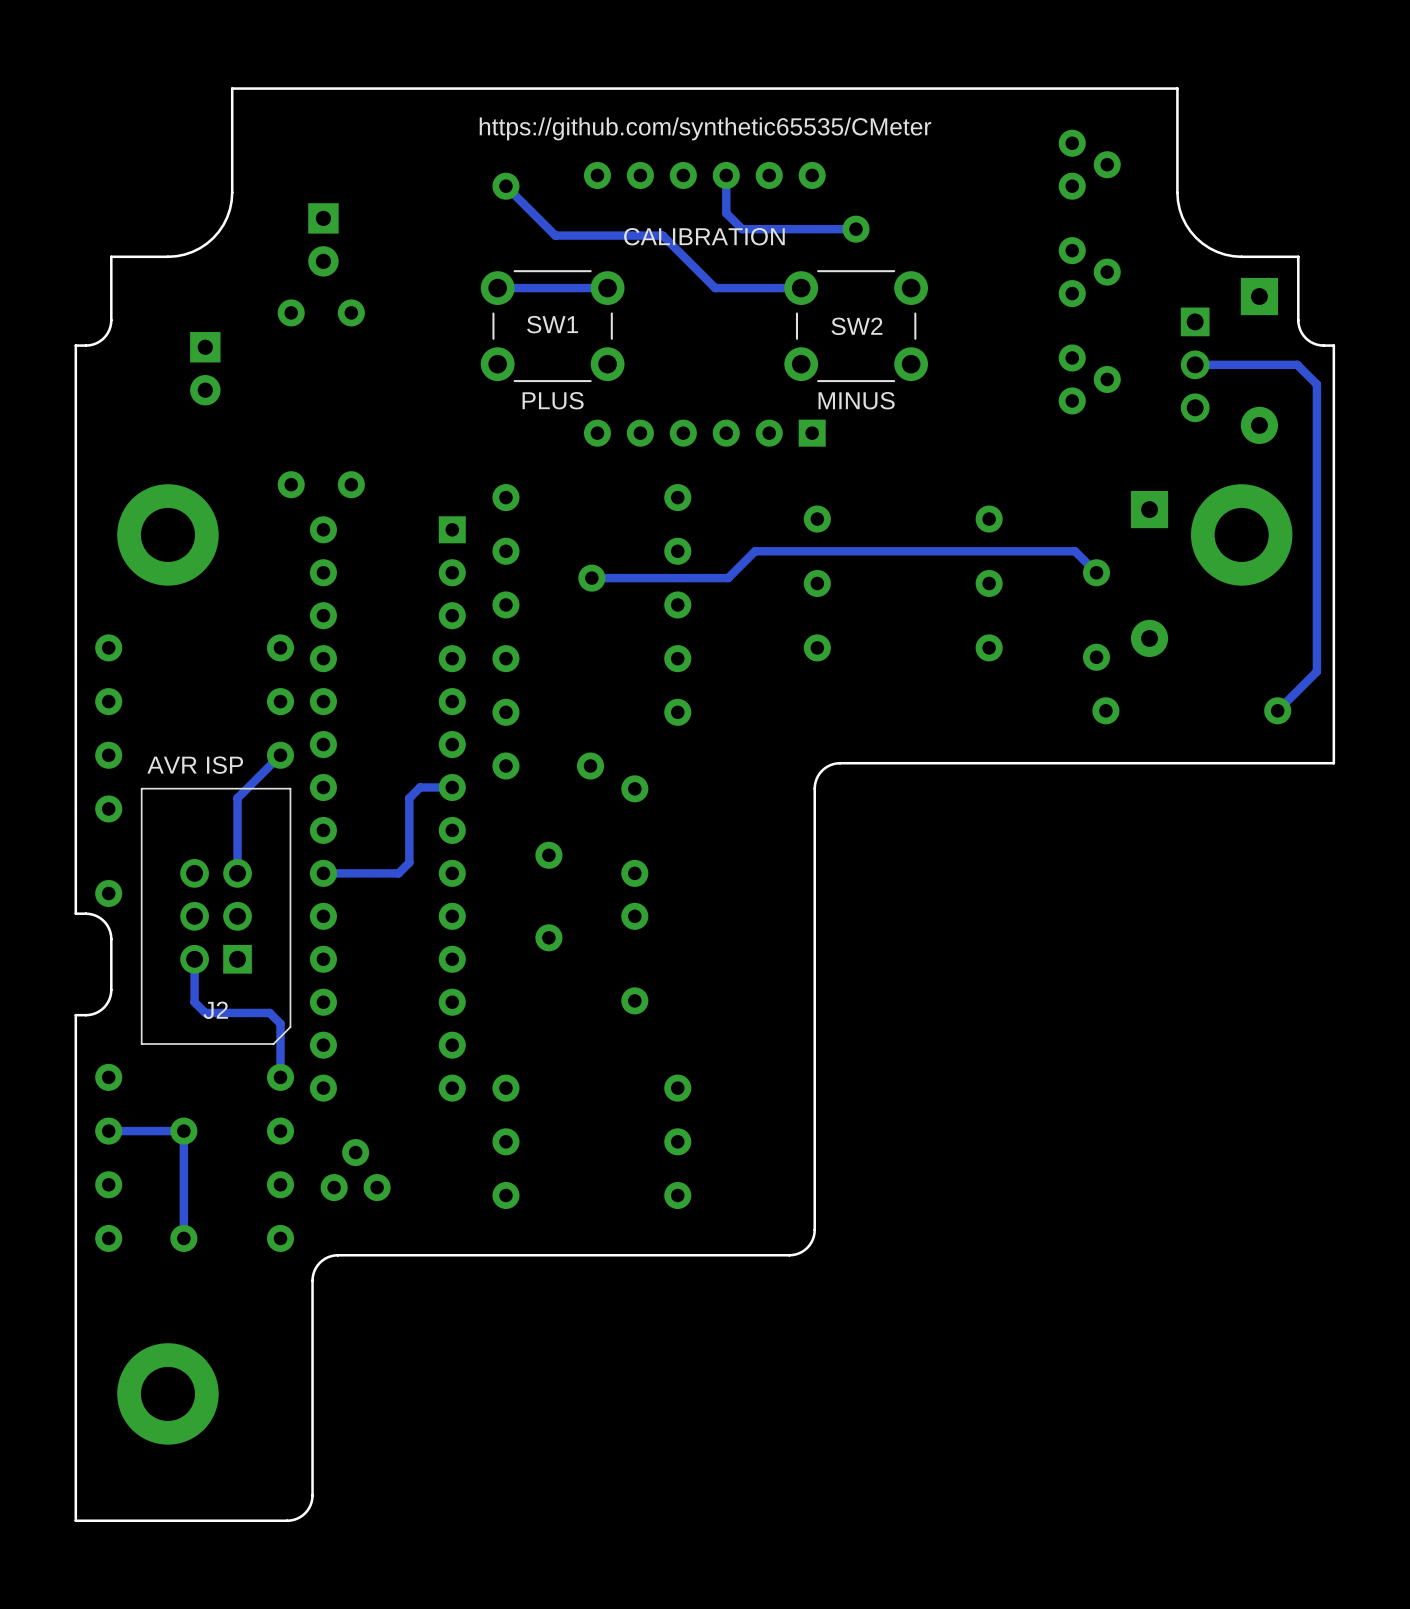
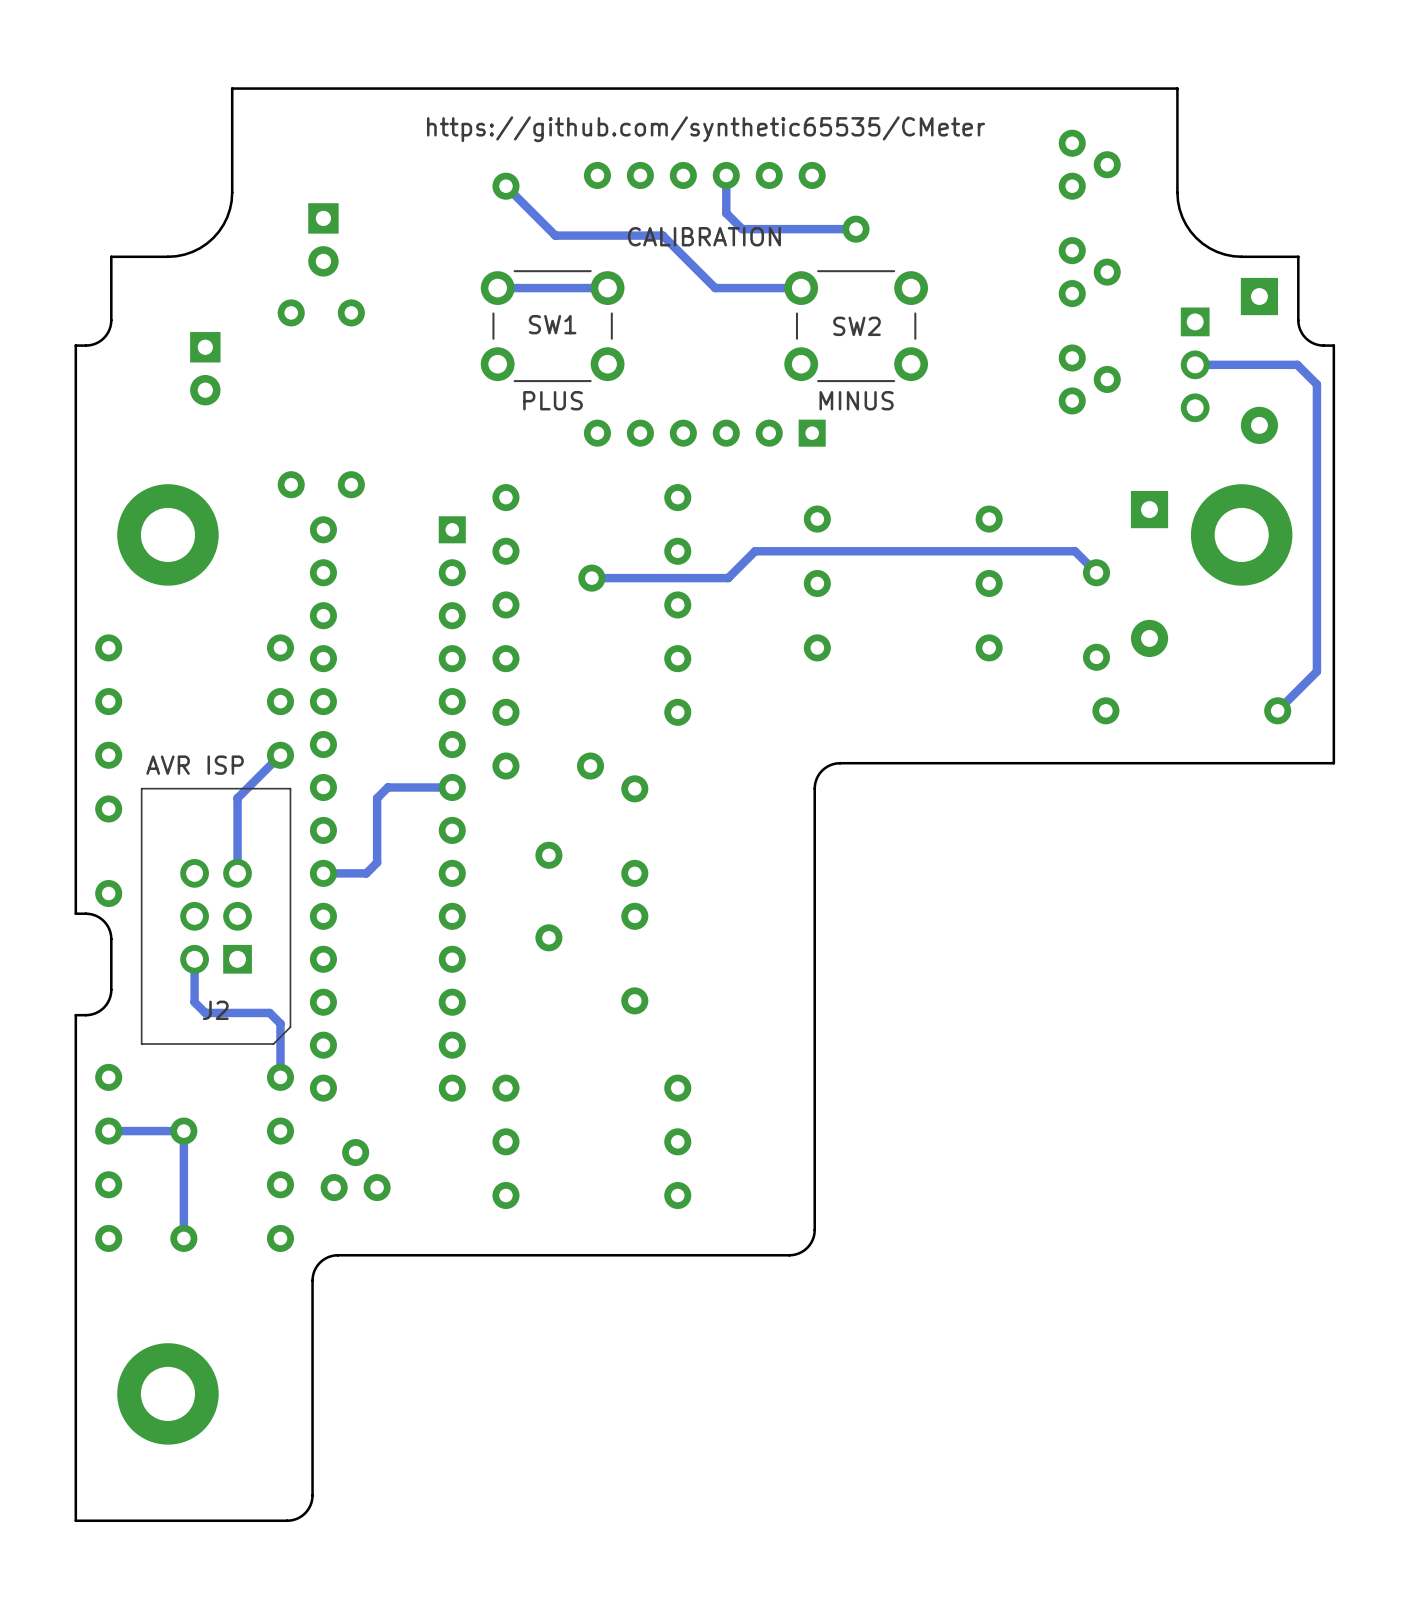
track: (420, 787) (409, 798) (409, 862) (398, 873) (366, 873) -> (420, 787) (387, 787) (377, 798) (377, 862) (366, 873)

